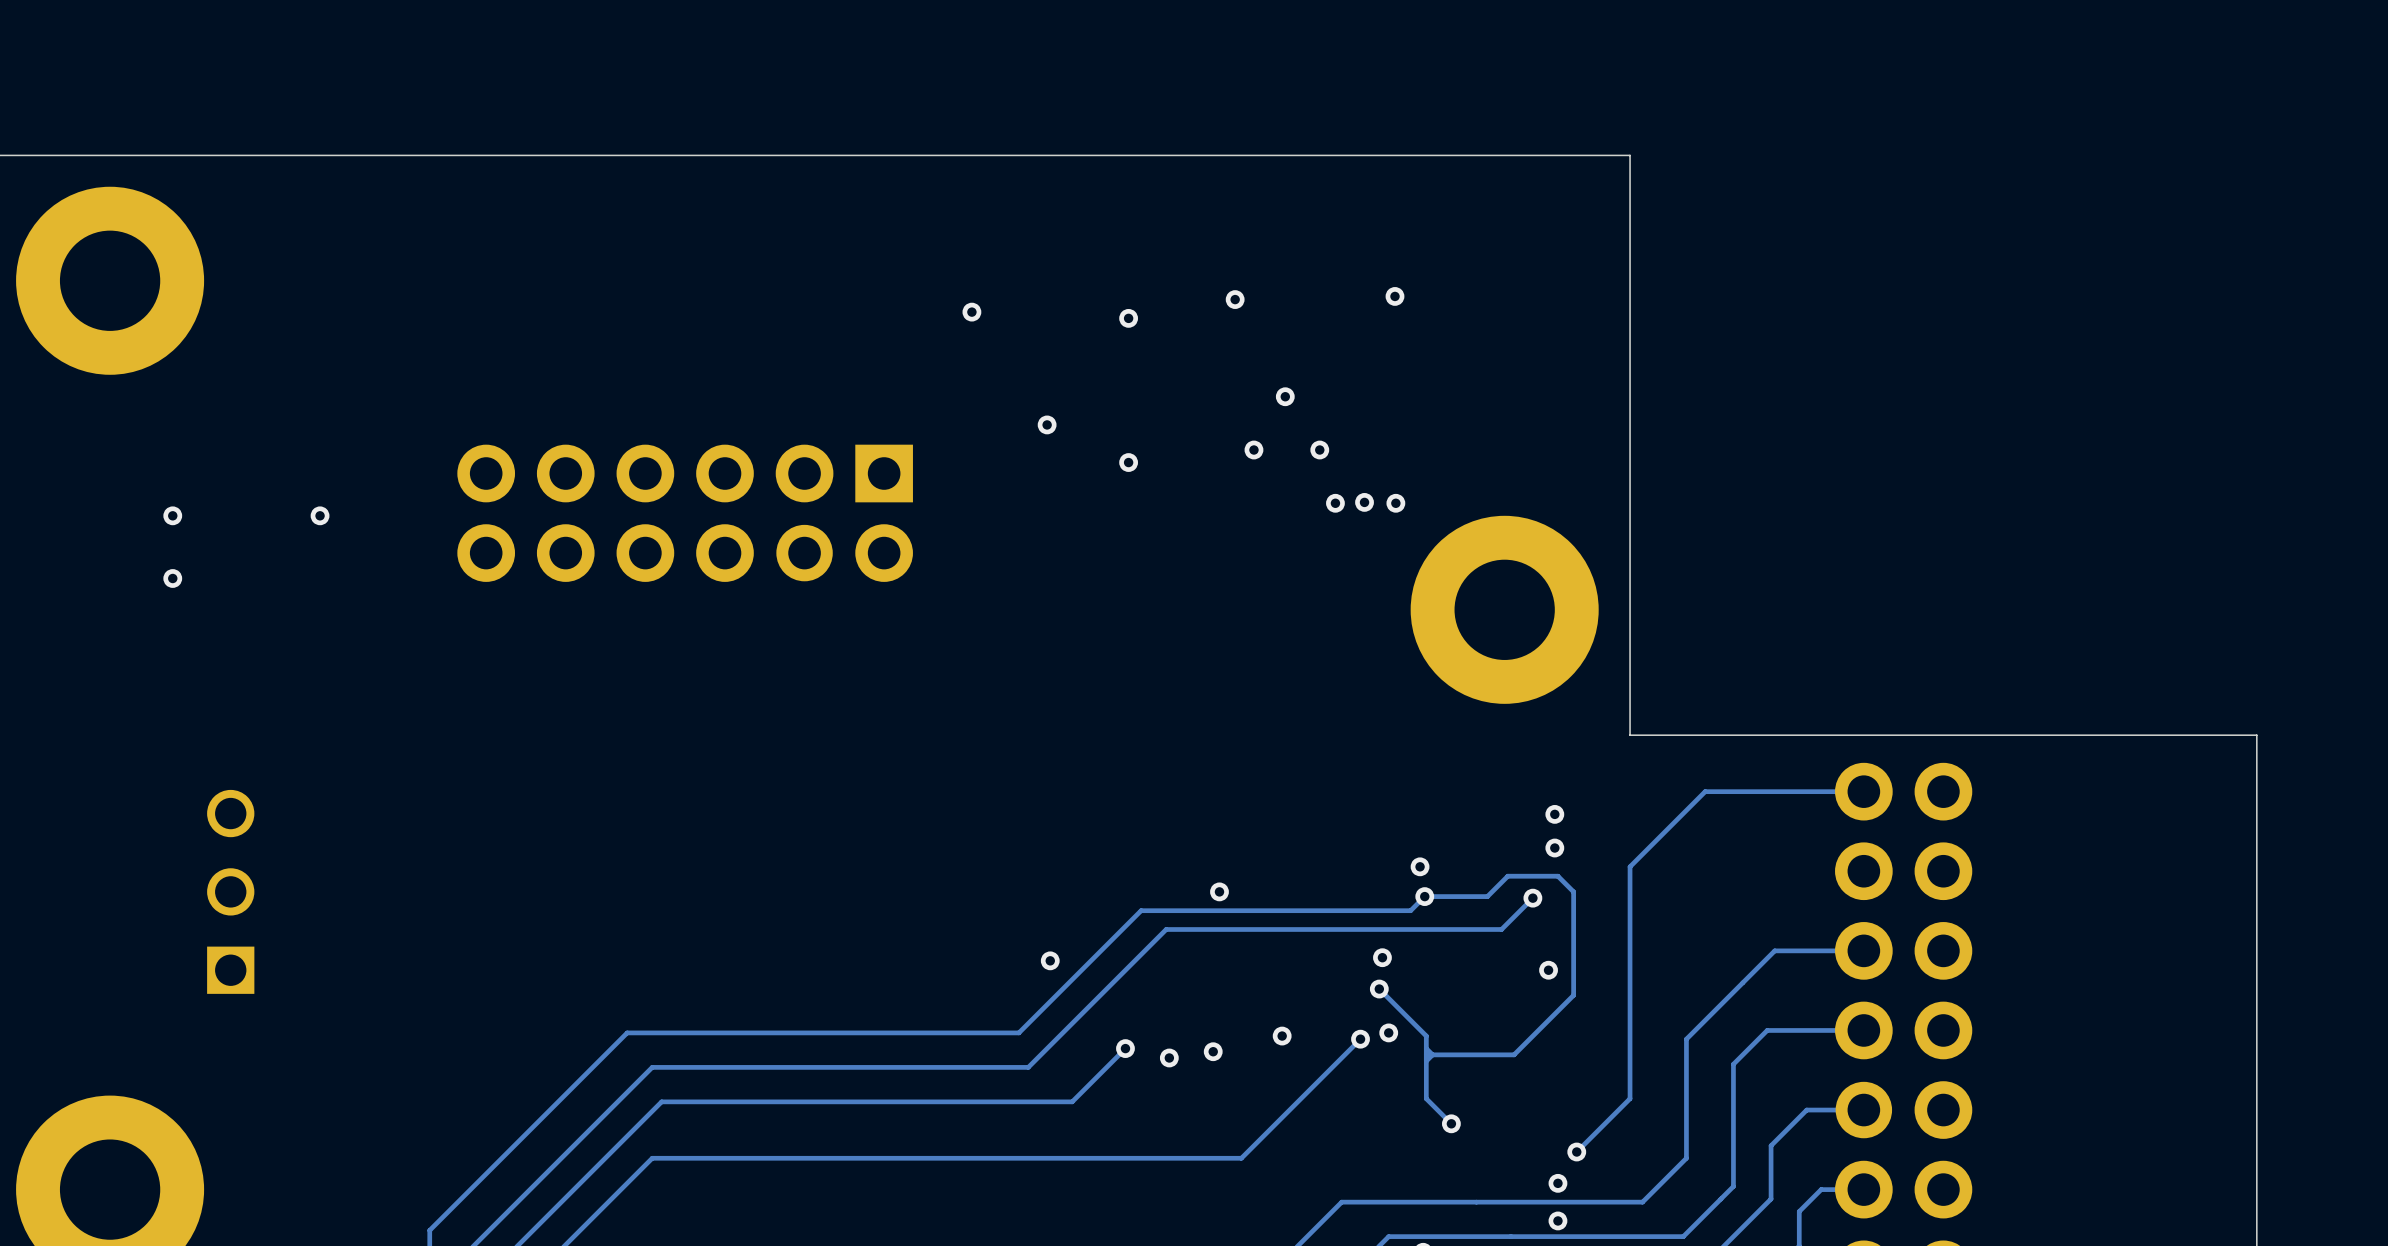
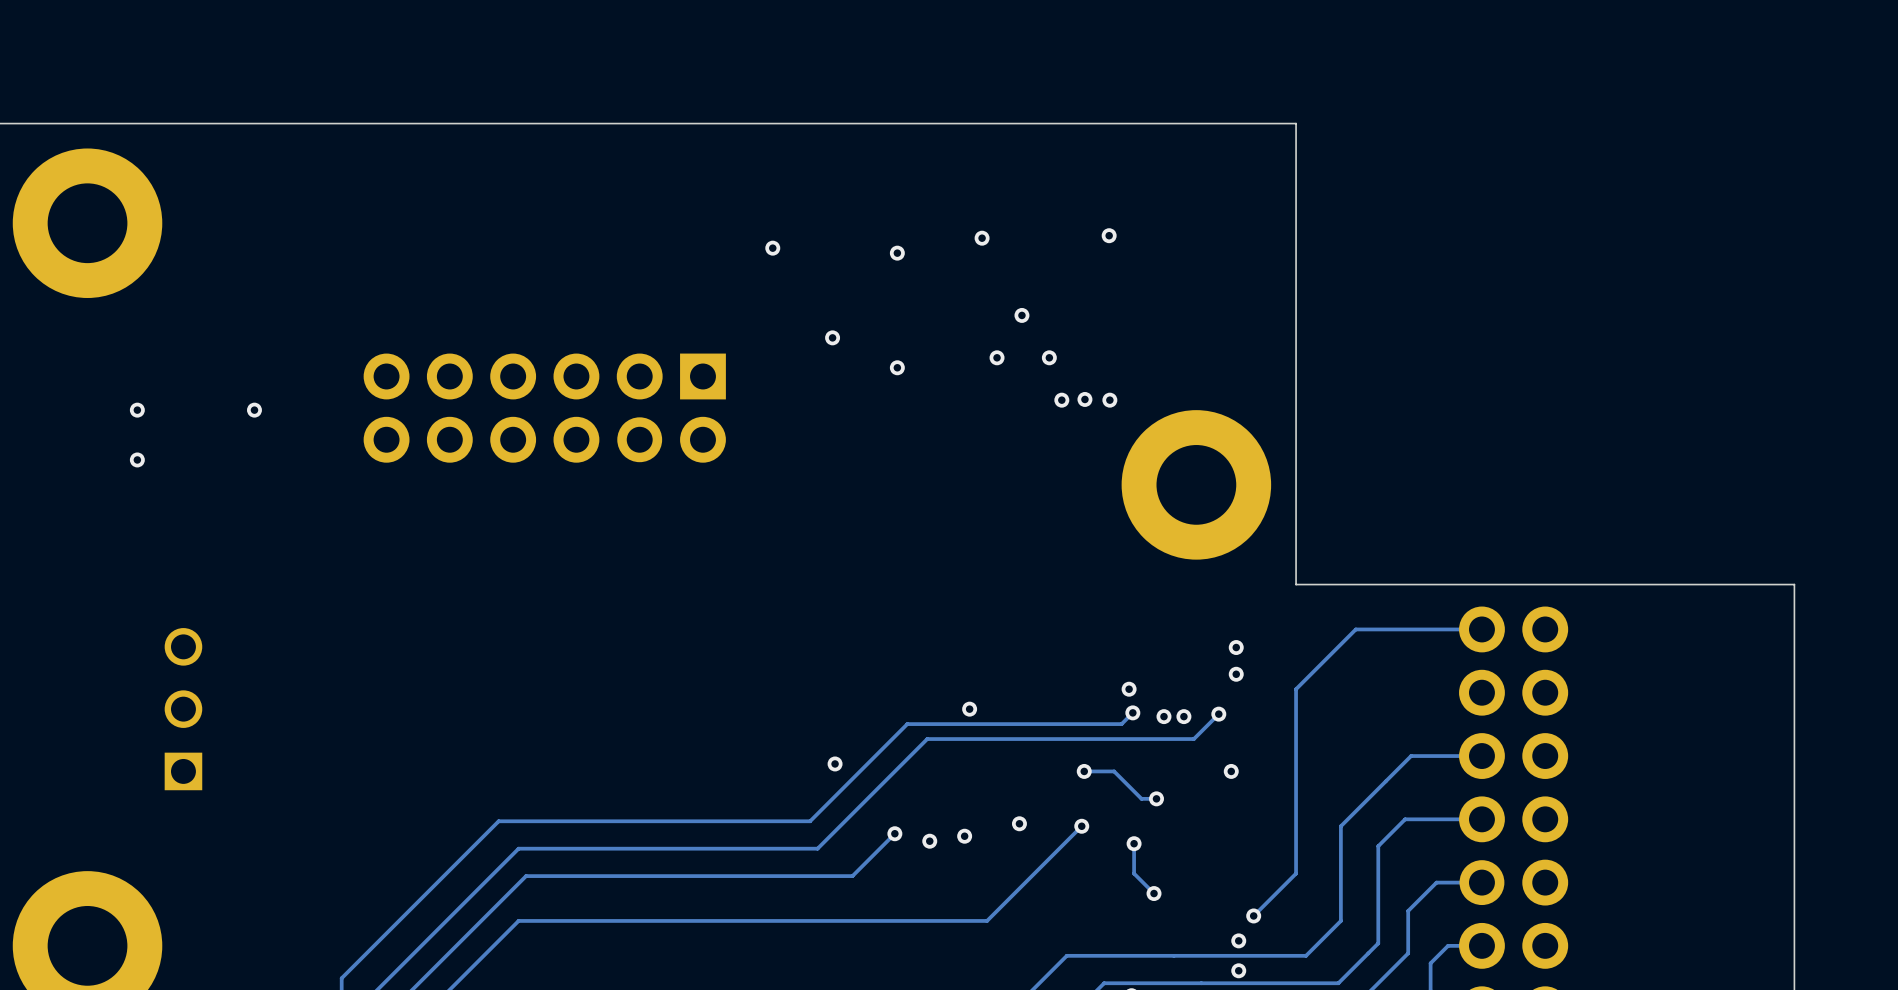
track: (1424, 896) (1487, 896) (1507, 876) (1557, 876) (1573, 891) (1573, 995) (1514, 1054) (1426, 1054) -> none
via: none -> (1163, 716)
via: none -> (1183, 716)
via: (1382, 957) -> none
track: none -> (1084, 771) (1114, 771) (1141, 798) (1156, 798)
via: none -> (1084, 771)
track: (1379, 989) (1426, 1036) (1426, 1061) (1432, 1054) (1426, 1048) -> none
via: (1379, 989) -> none
via: none -> (1156, 798)
via: (1388, 1032) -> none
via: none -> (1134, 843)

